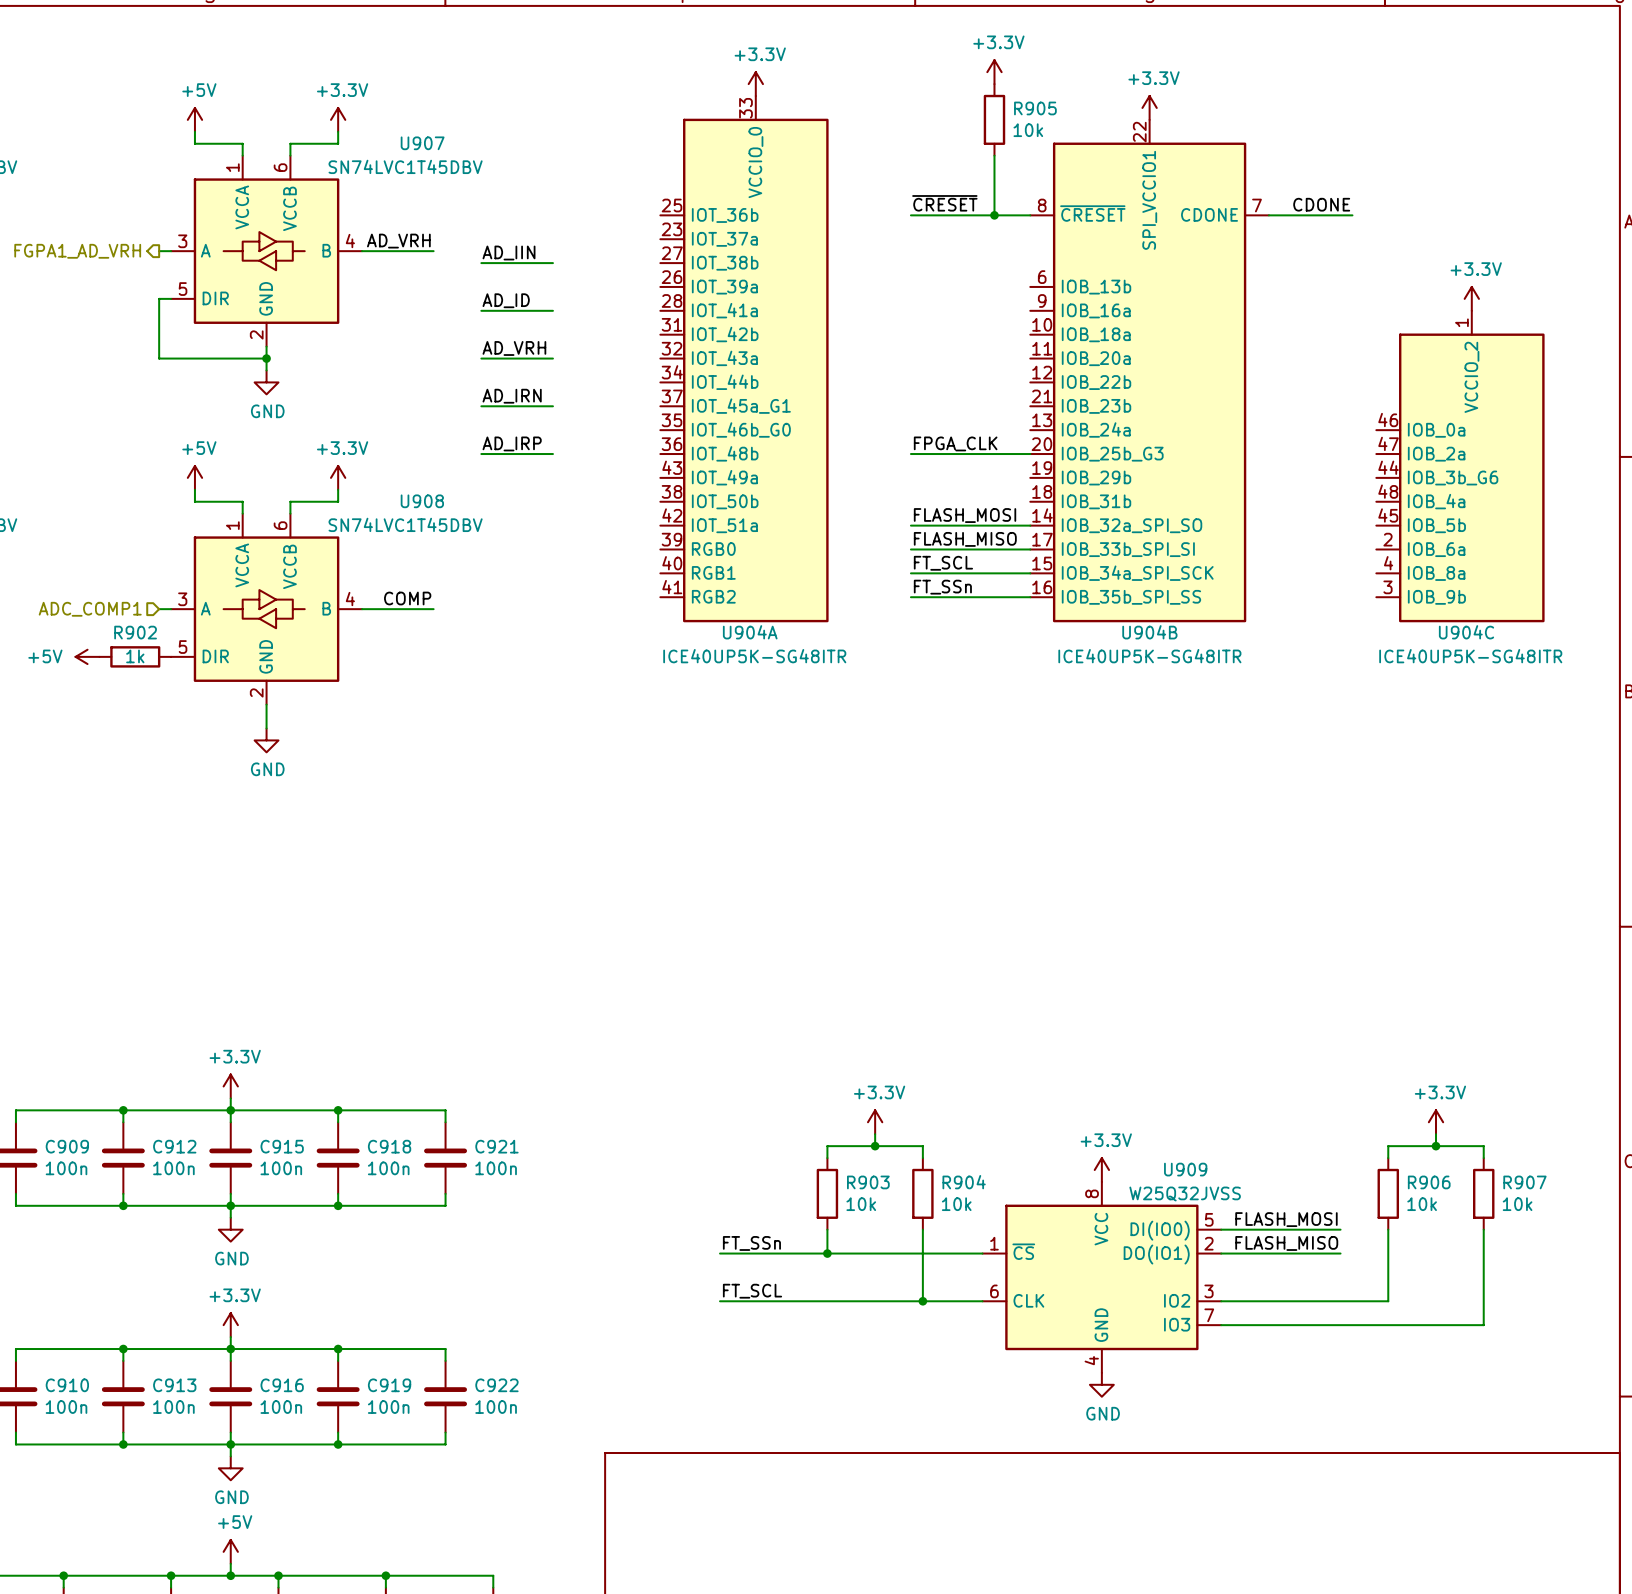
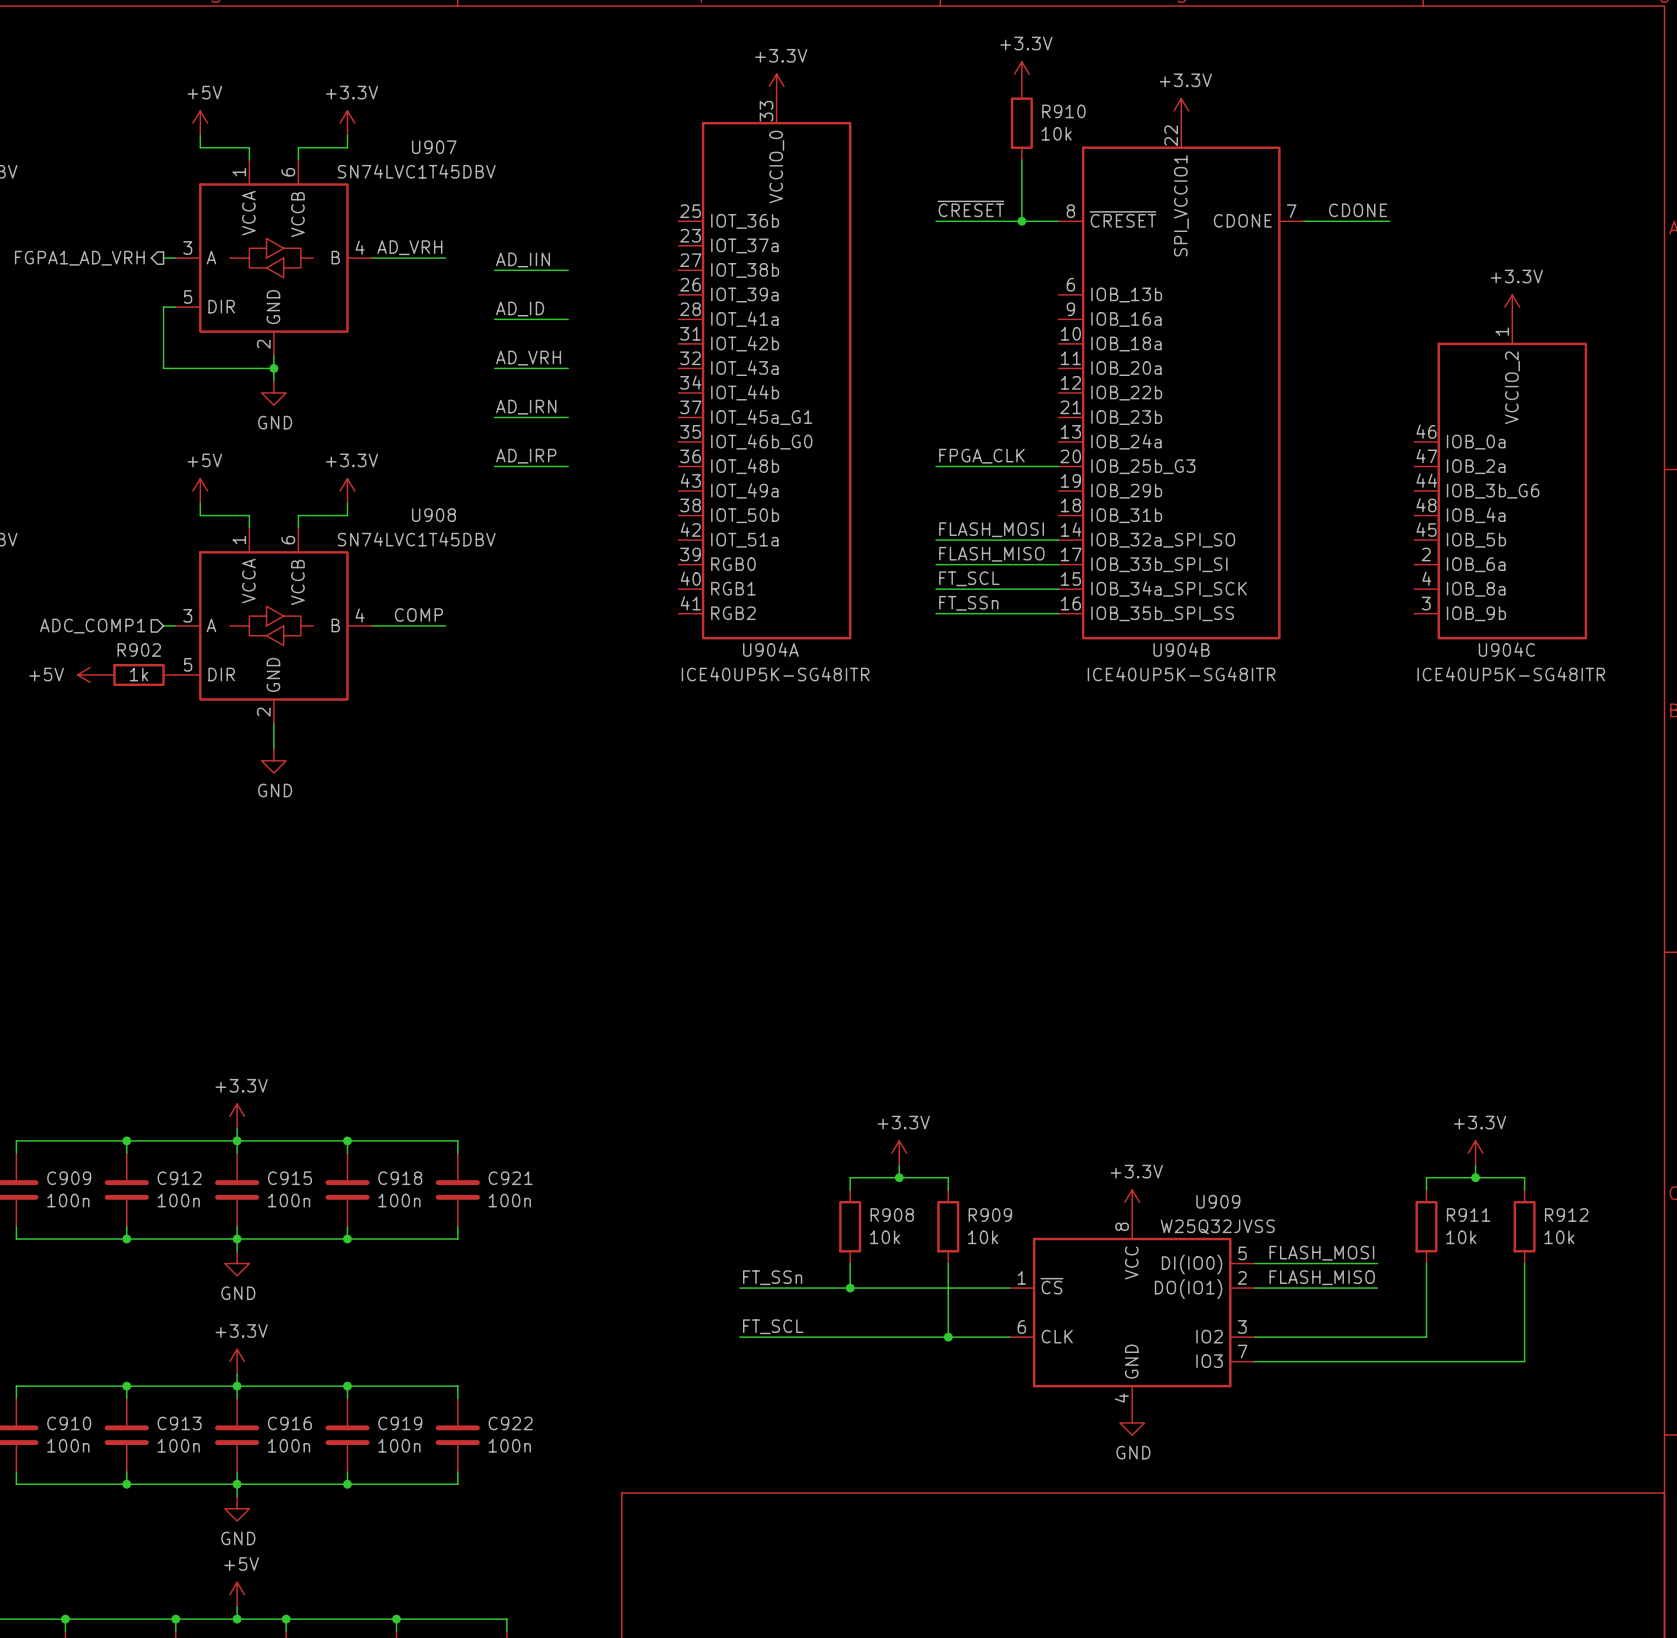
R905 name: R905 (1035, 108) -> R910 (1063, 111)
R903 name: R903 (868, 1182) -> R908 (892, 1215)
R904 name: R904 (964, 1182) -> R909 (990, 1215)
R906 name: R906 (1429, 1182) -> R911 (1468, 1215)
R907 name: R907 (1524, 1182) -> R912 (1566, 1215)

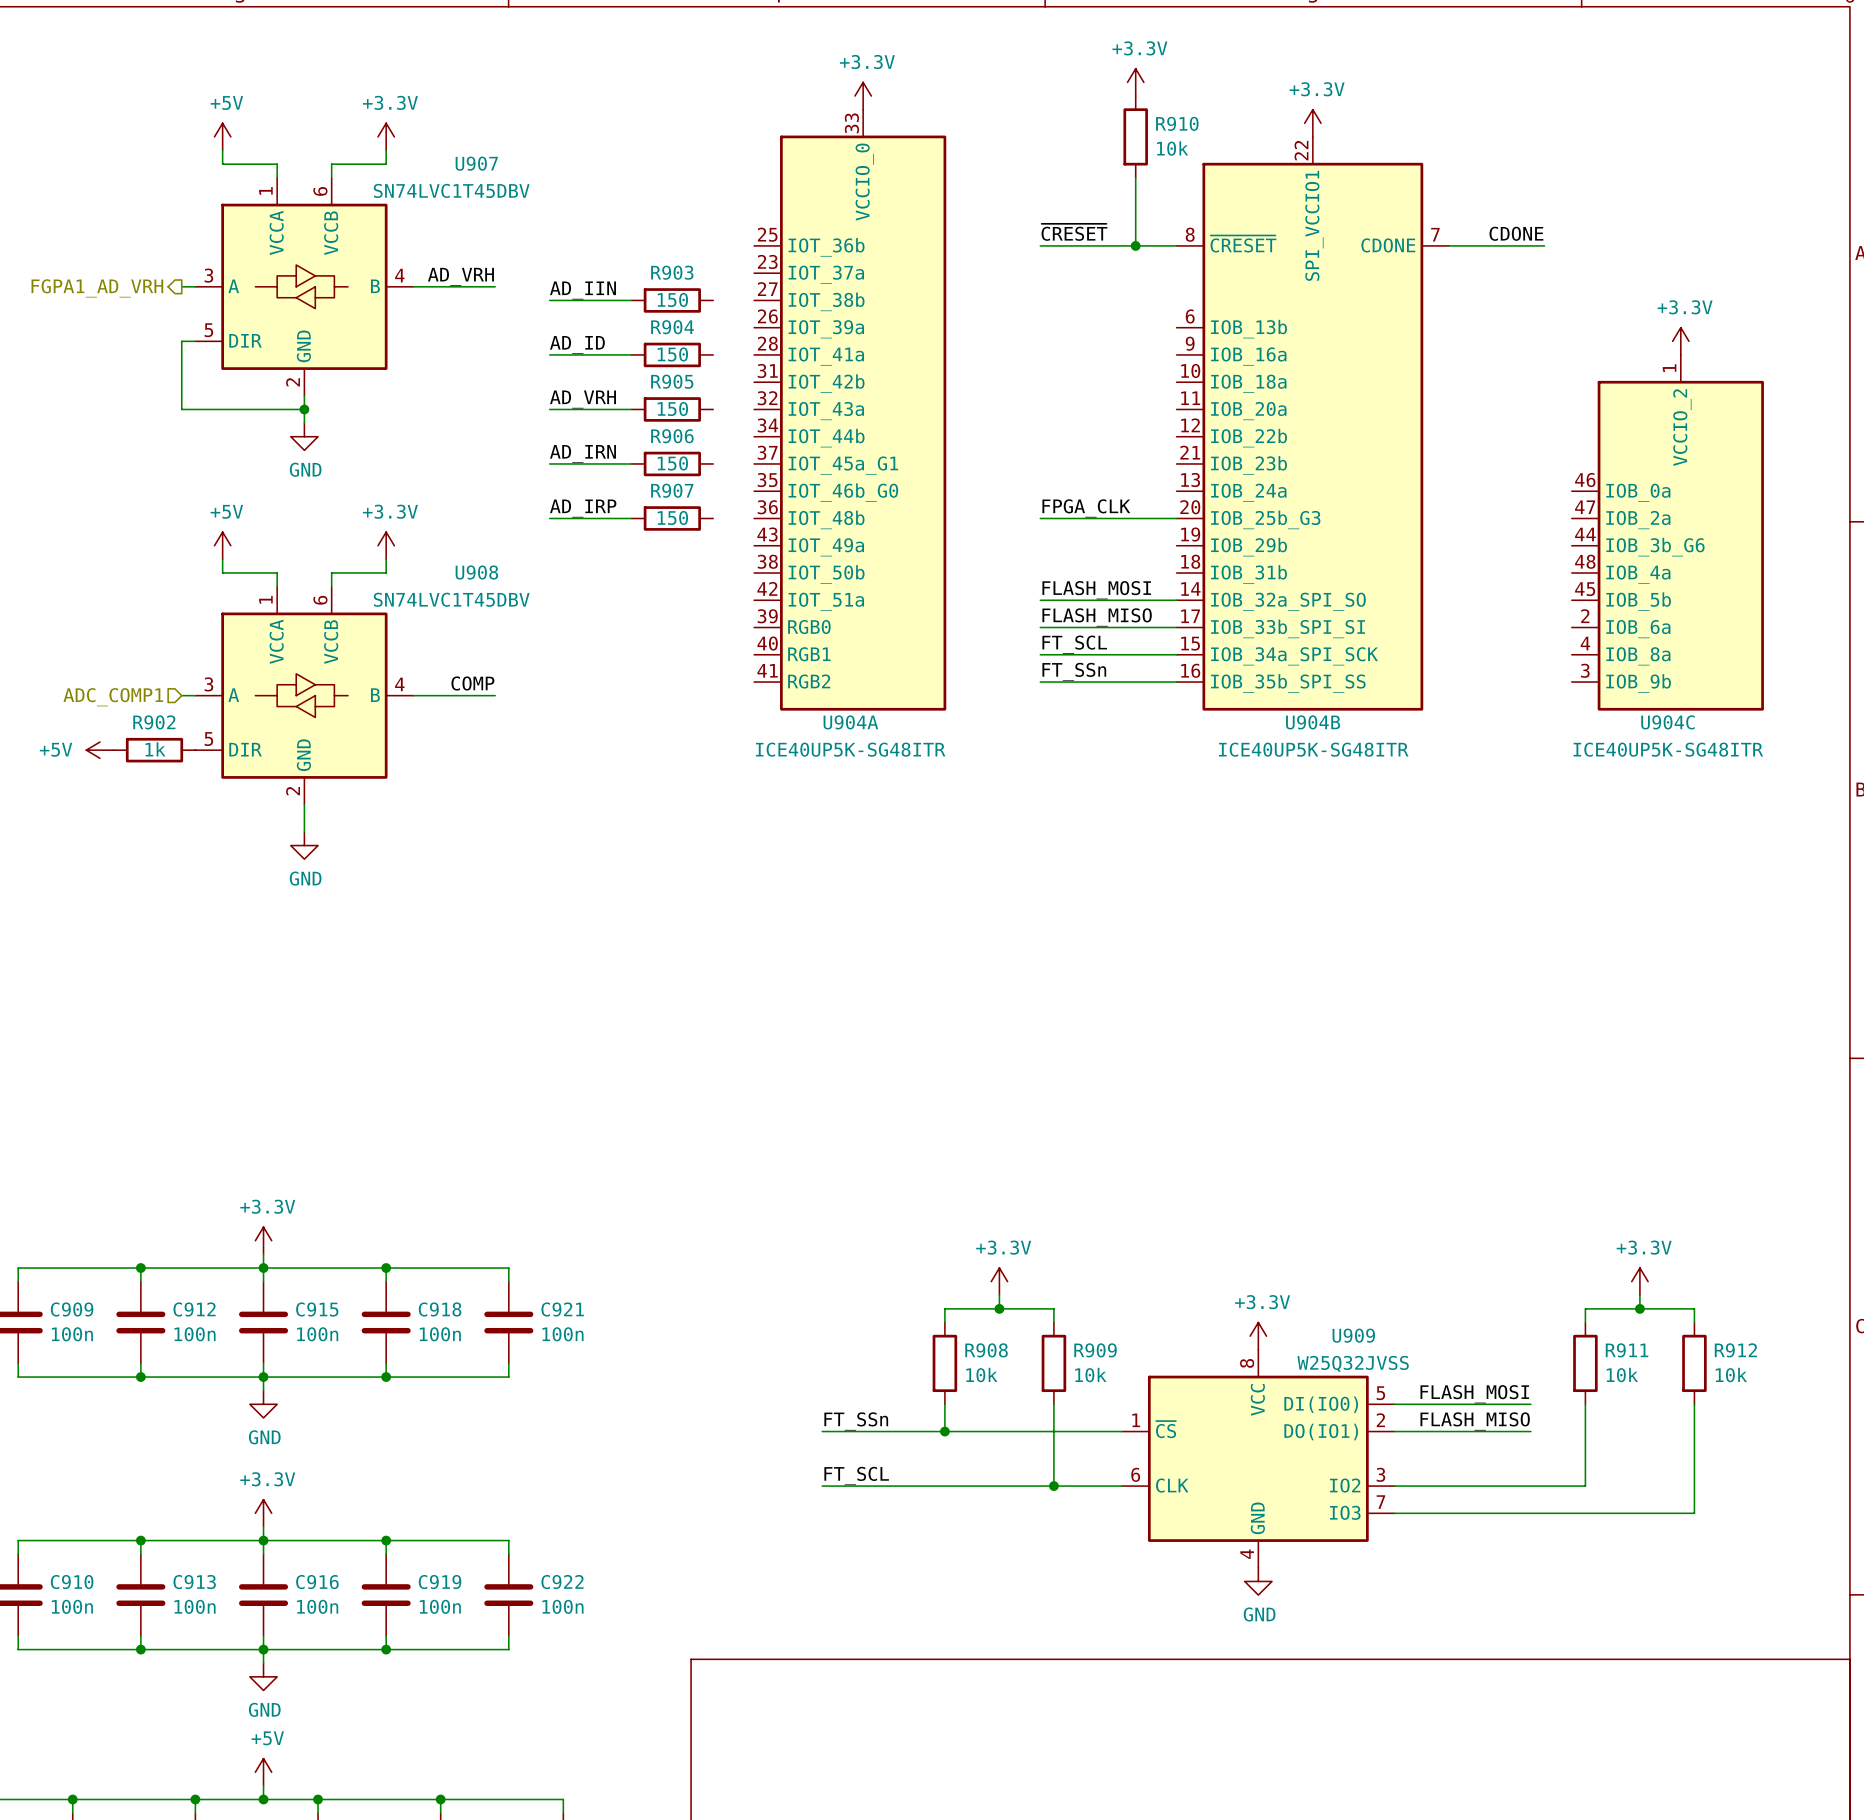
R903: none -> 150 (672, 300)
R904: none -> 150 (672, 354)
R905: none -> 150 (672, 409)
R906: none -> 150 (672, 463)
R907: none -> 150 (672, 518)

